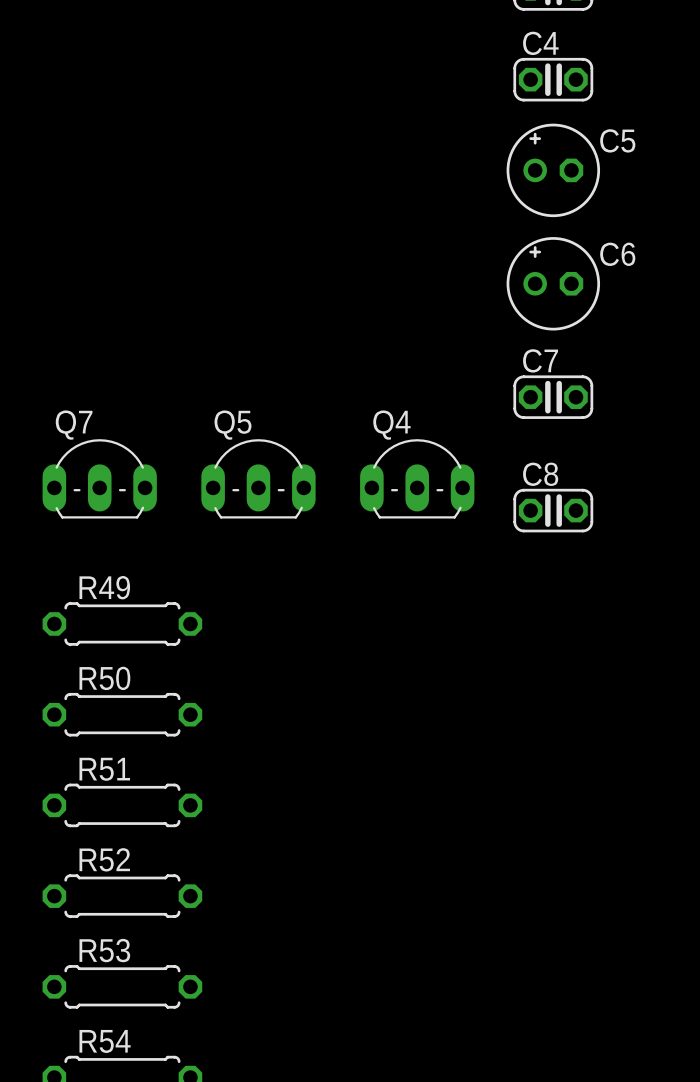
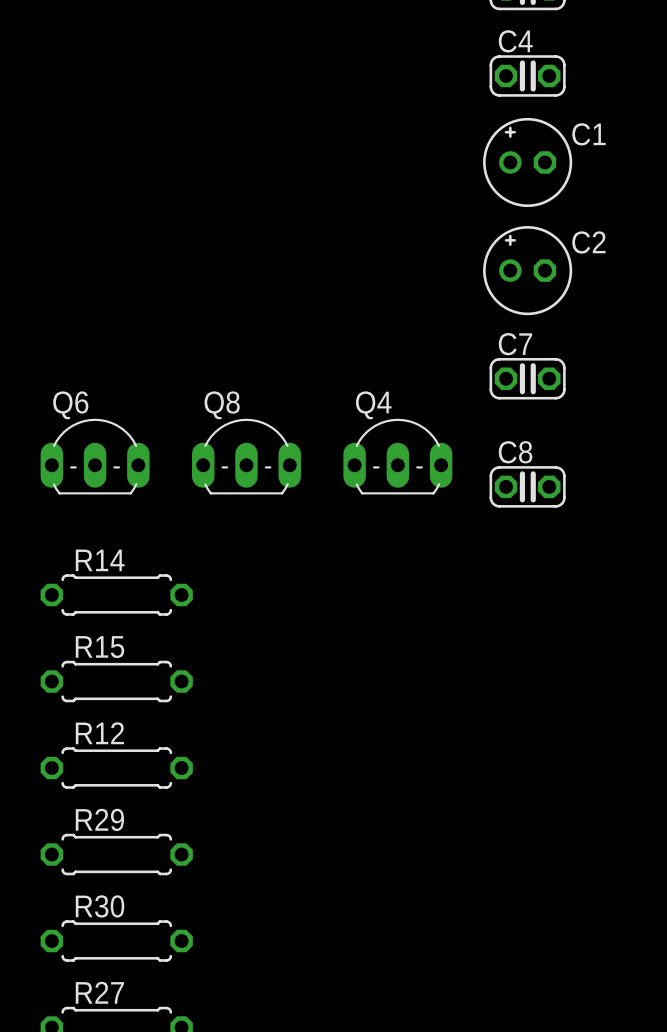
C5 name: C5 (617, 140) -> C1 (588, 134)
C6 name: C6 (617, 254) -> C2 (588, 242)
Q7 name: Q7 (74, 425) -> Q6 (70, 405)
Q5 name: Q5 (232, 425) -> Q8 (222, 405)
R49 name: R49 (104, 587) -> R14 (100, 560)
R50 name: R50 (104, 678) -> R15 (99, 647)
R51 name: R51 (104, 769) -> R12 (99, 733)
R52 name: R52 (104, 859) -> R29 (99, 819)
R53 name: R53 (104, 950) -> R30 (100, 906)
R54 name: R54 (105, 1041) -> R27 (99, 992)

